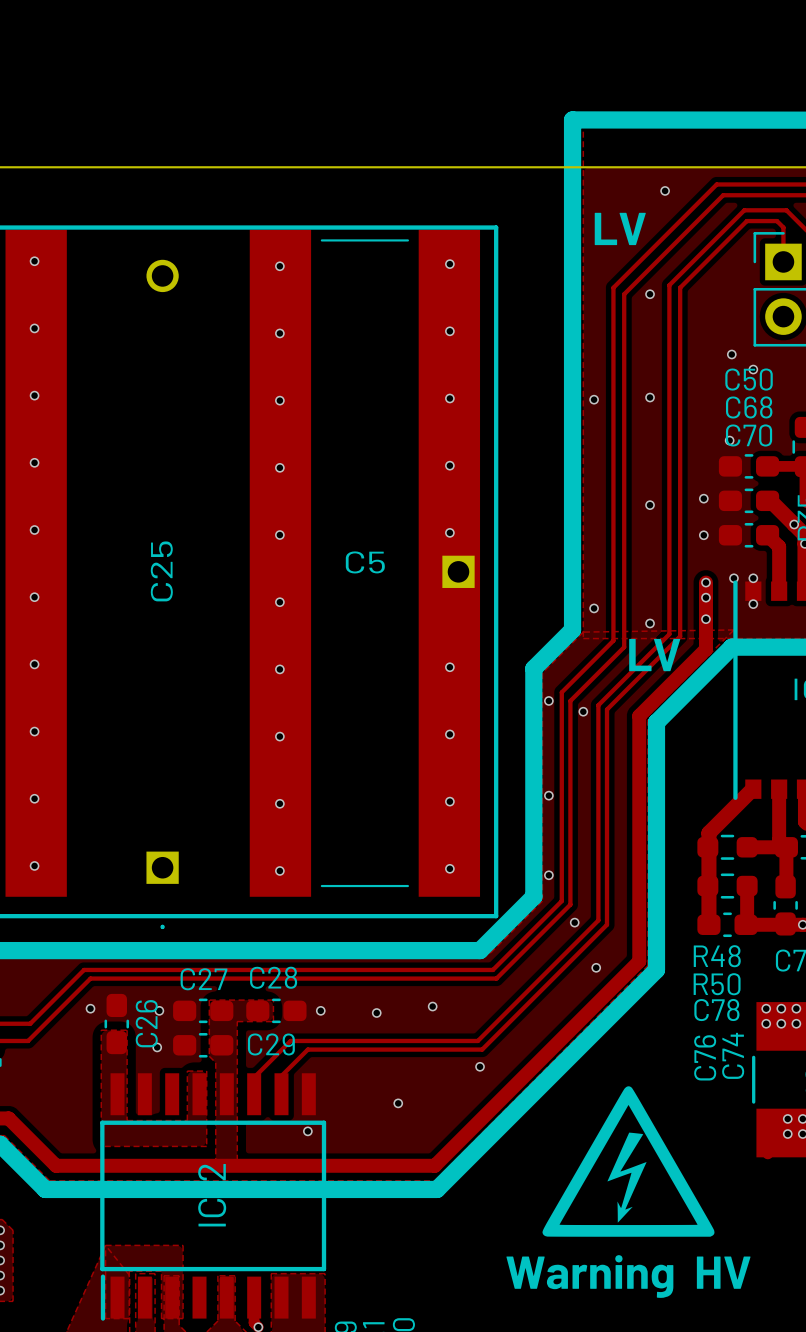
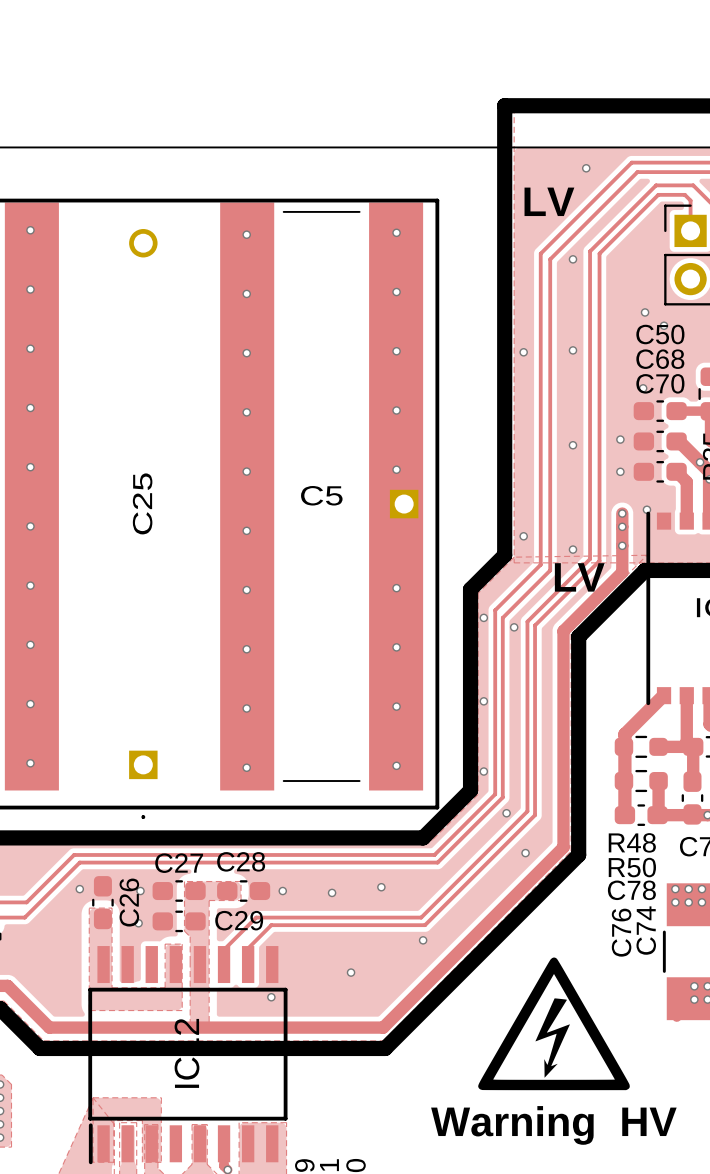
via: (753, 578) -> none
via: (753, 604) -> none

